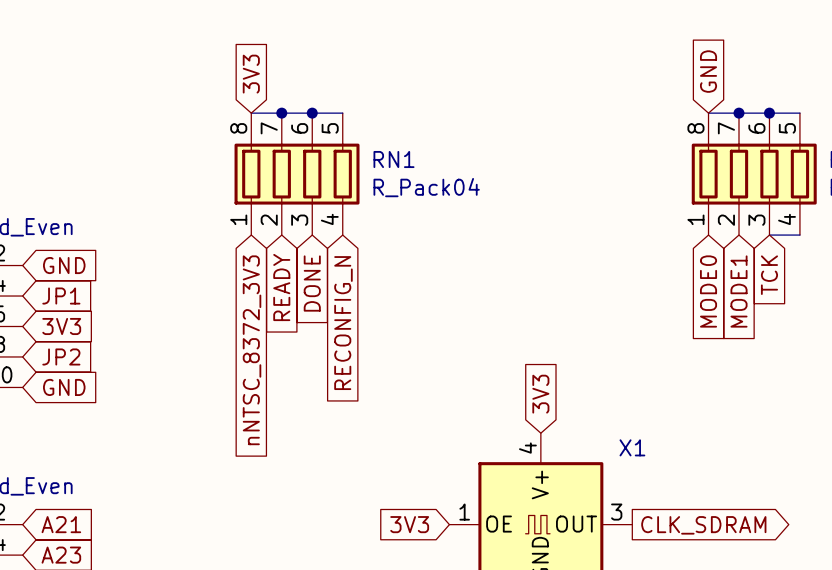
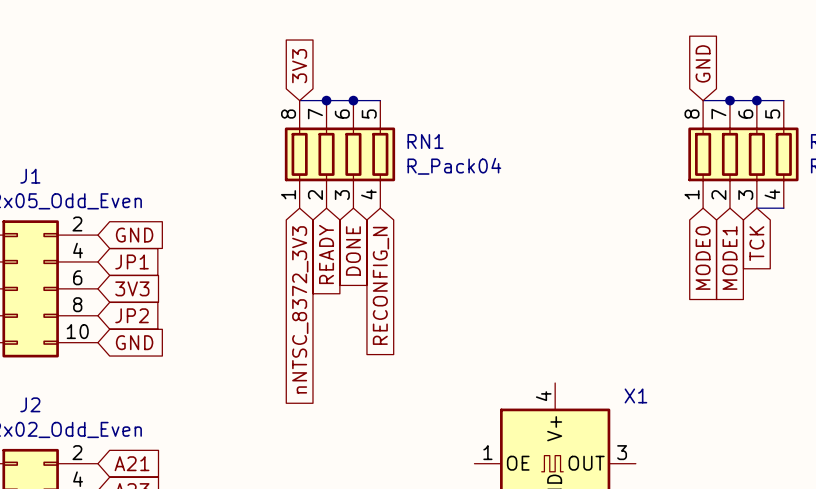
global label: 3V3 (540, 394) -> none
global label: 3V3 (409, 524) -> none
global label: CLK_SDRAM (703, 525) -> none

